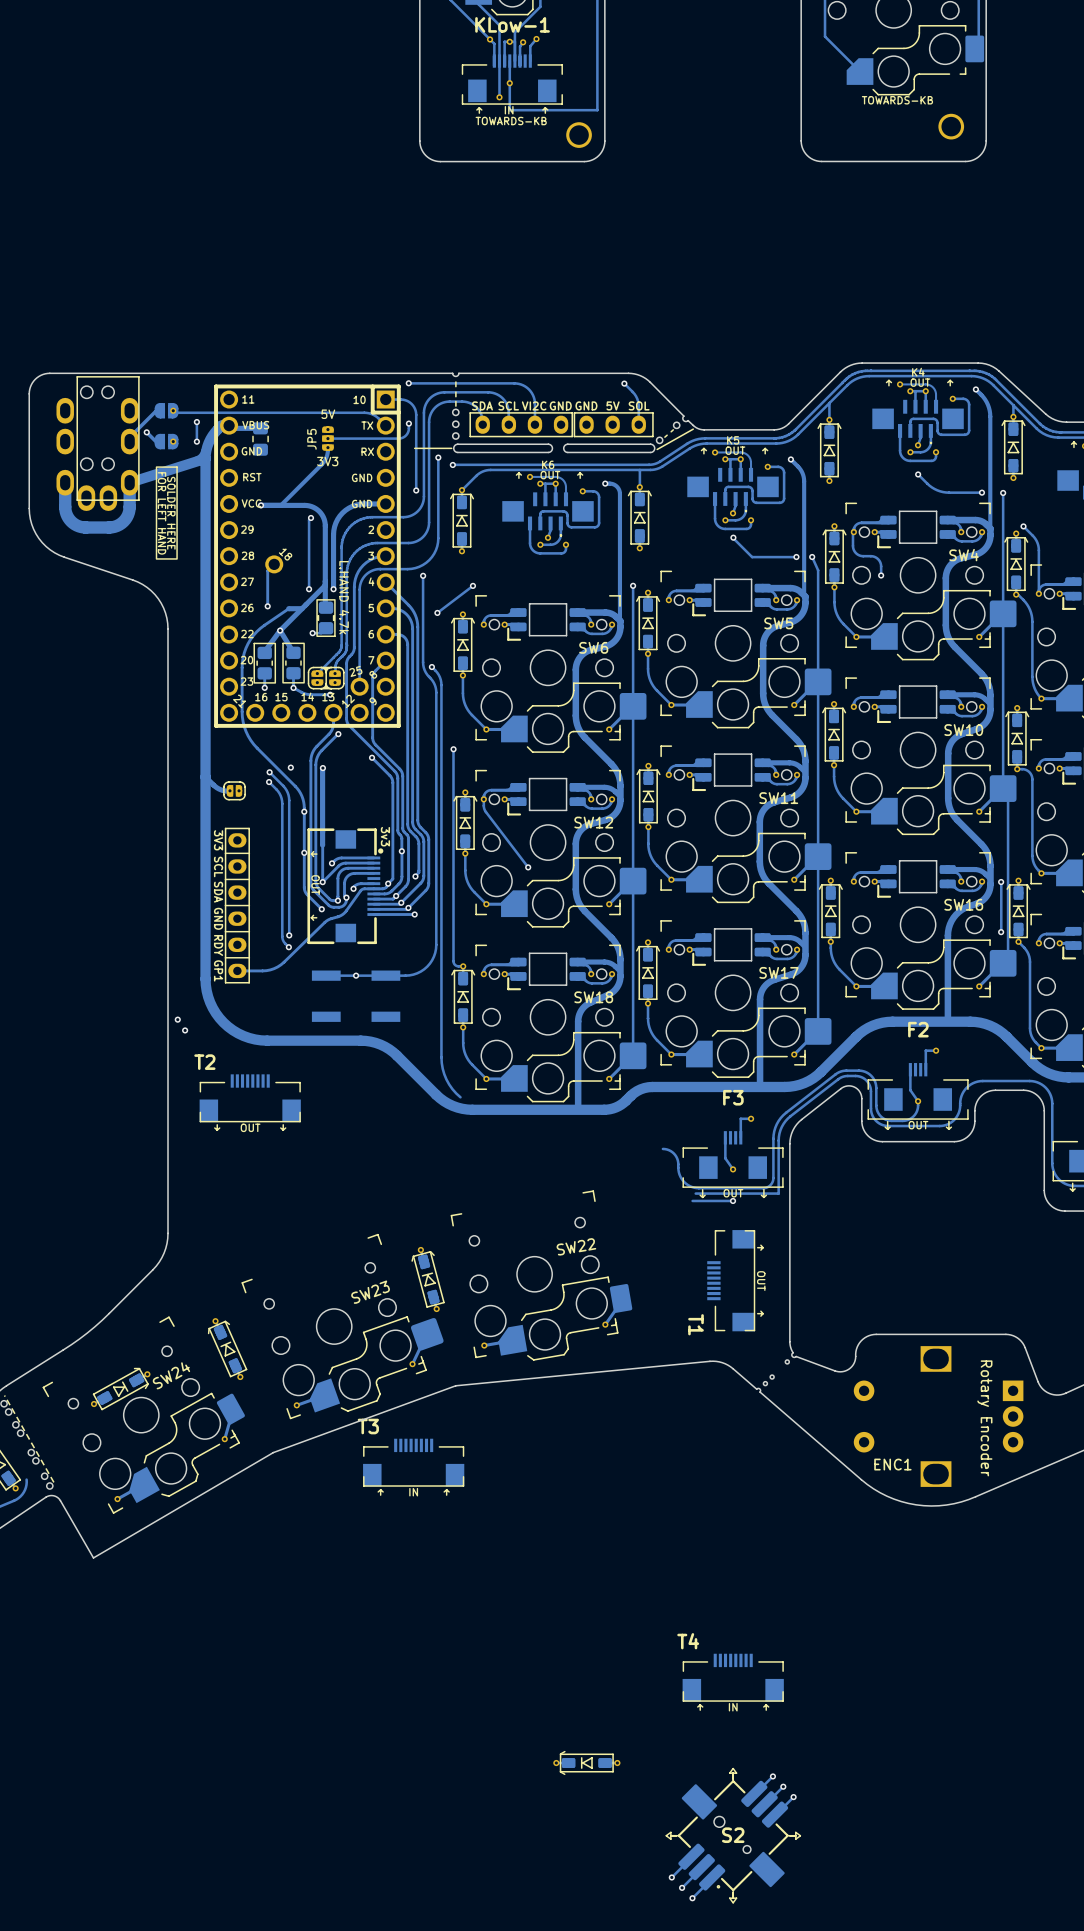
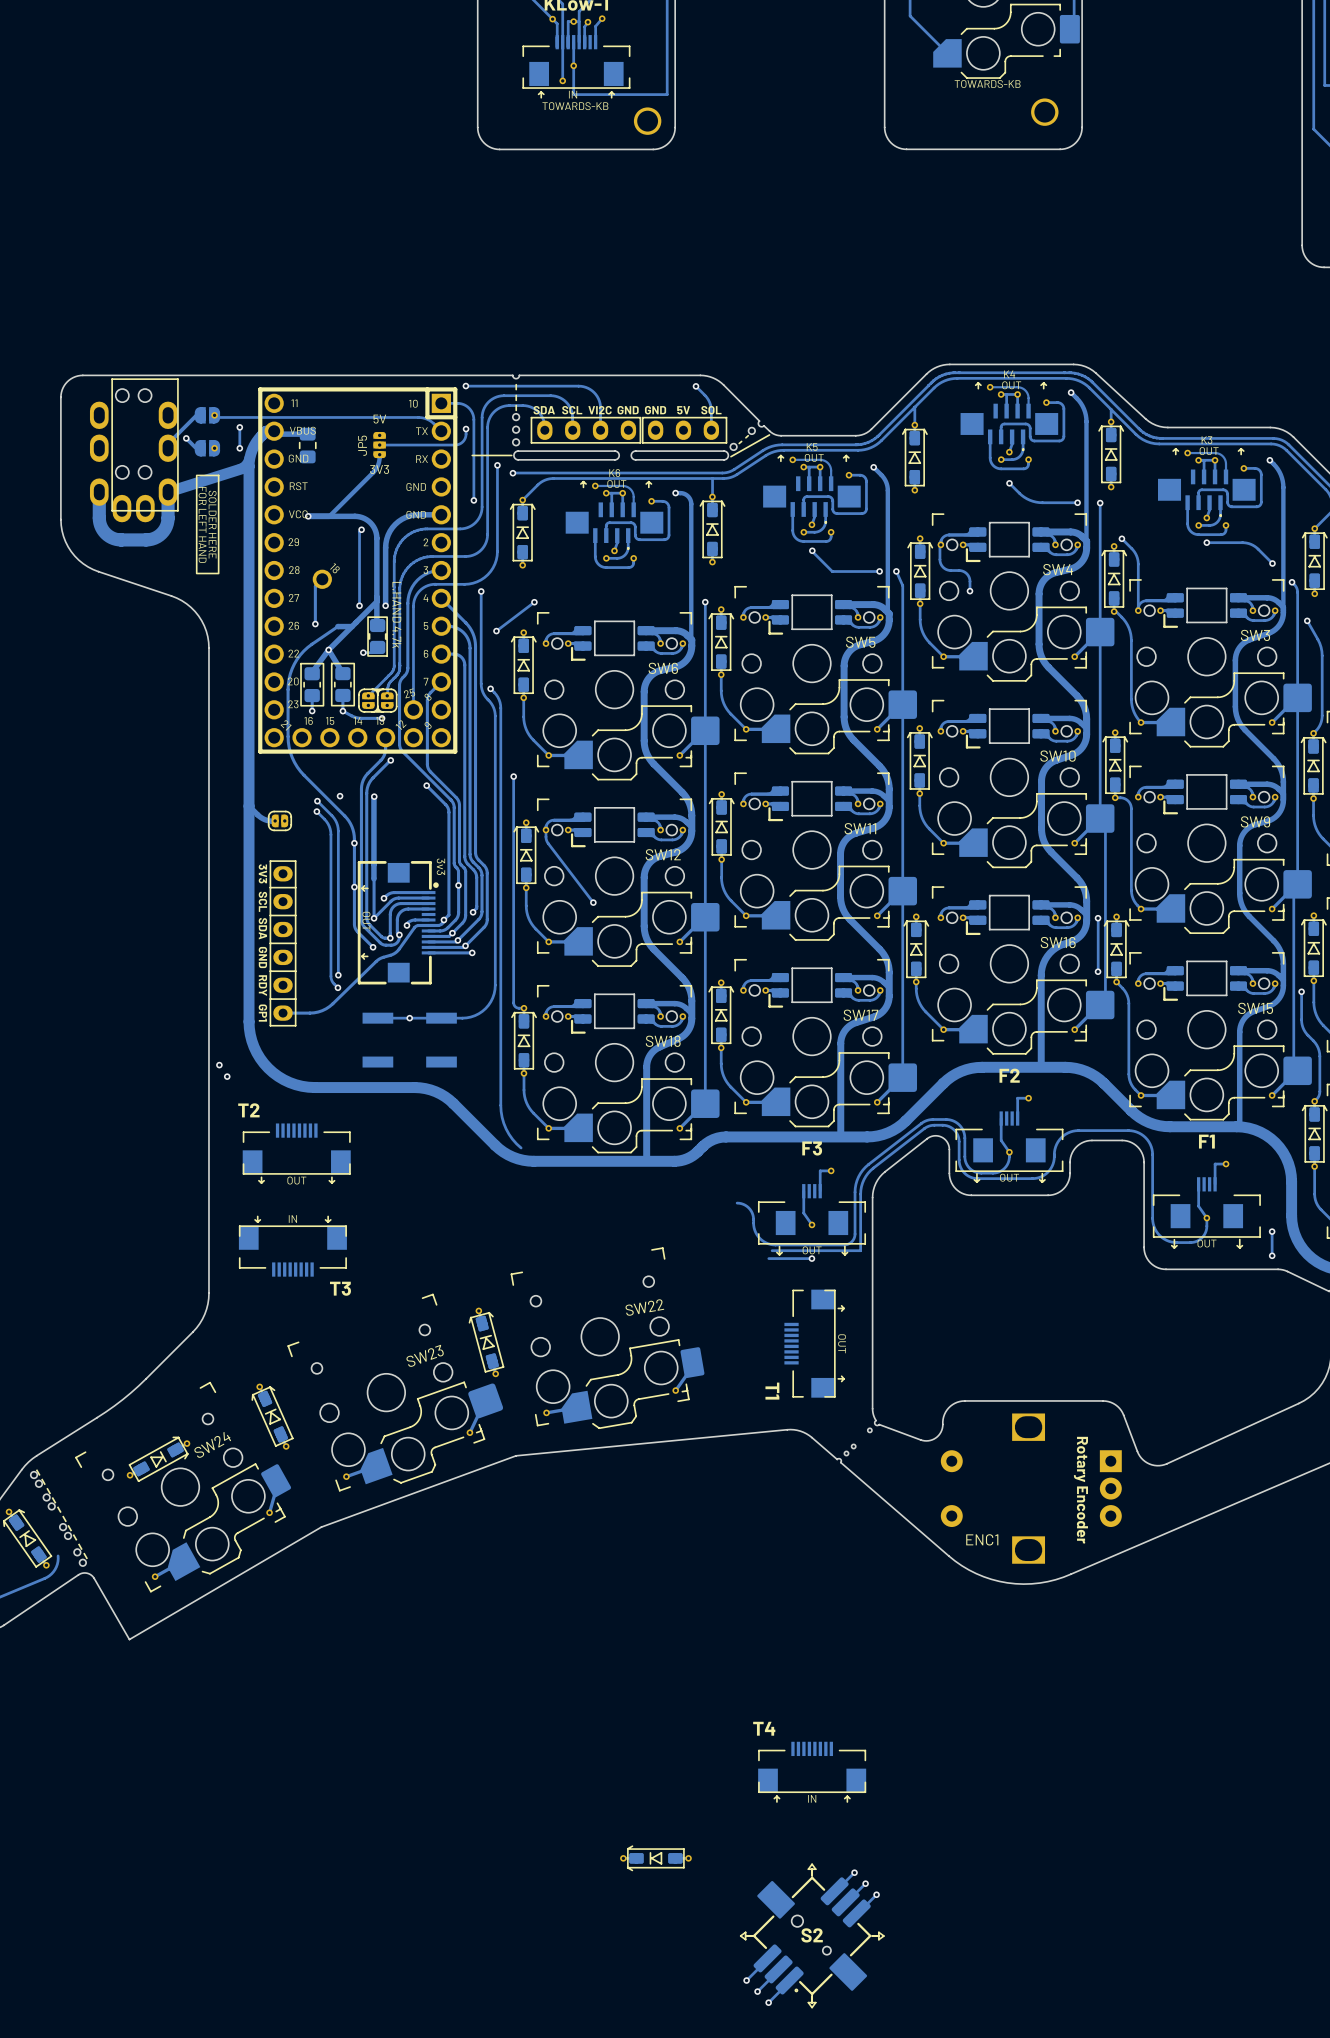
T3 rotation: 0° (413, 1467) -> 180° (292, 1246)
T3 position: (413, 1467) -> (292, 1246)

